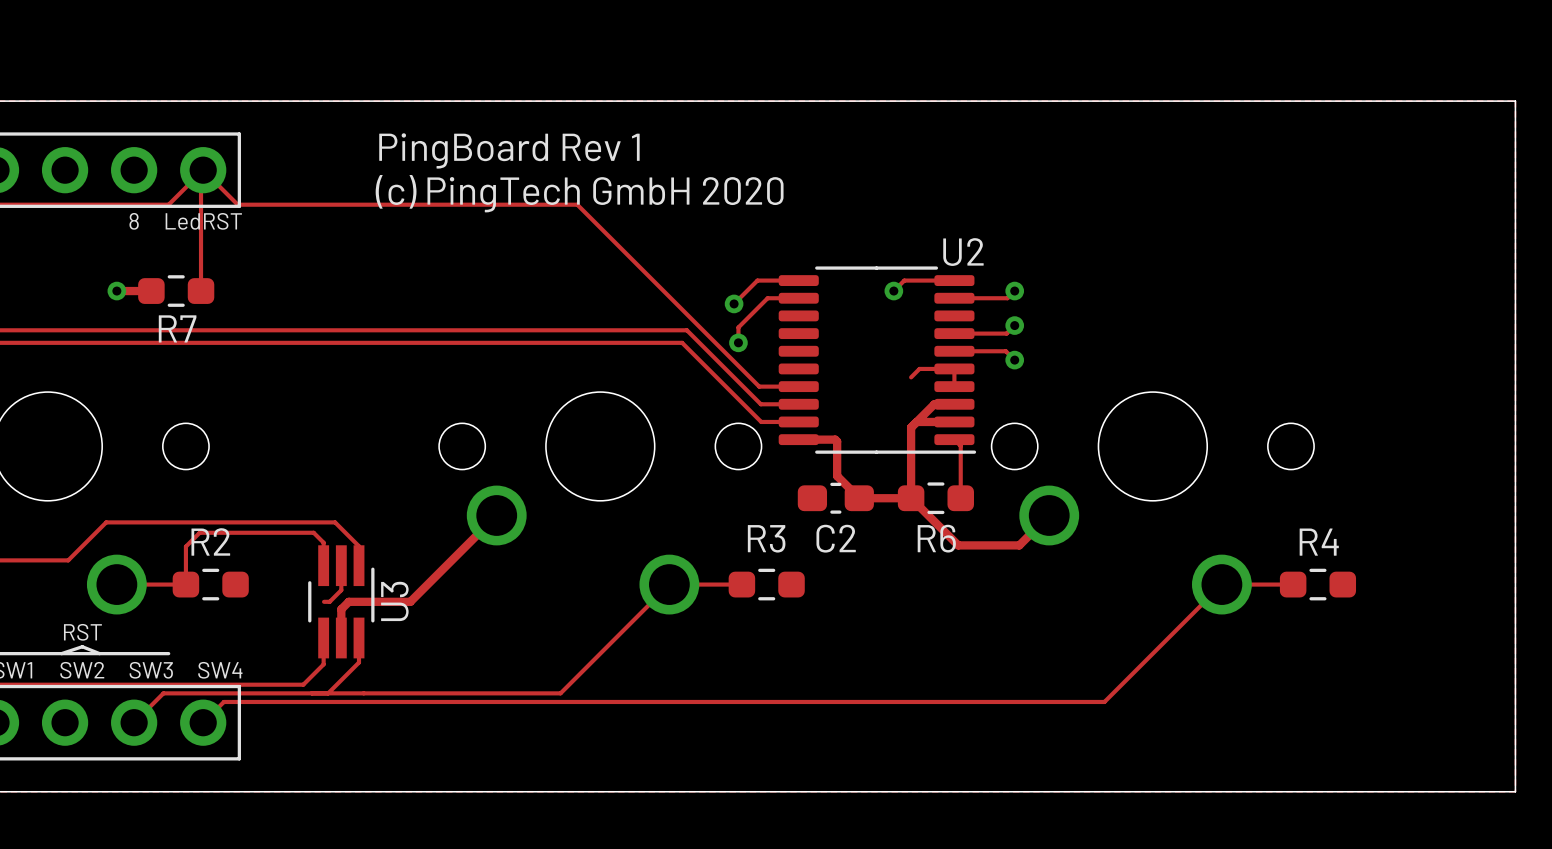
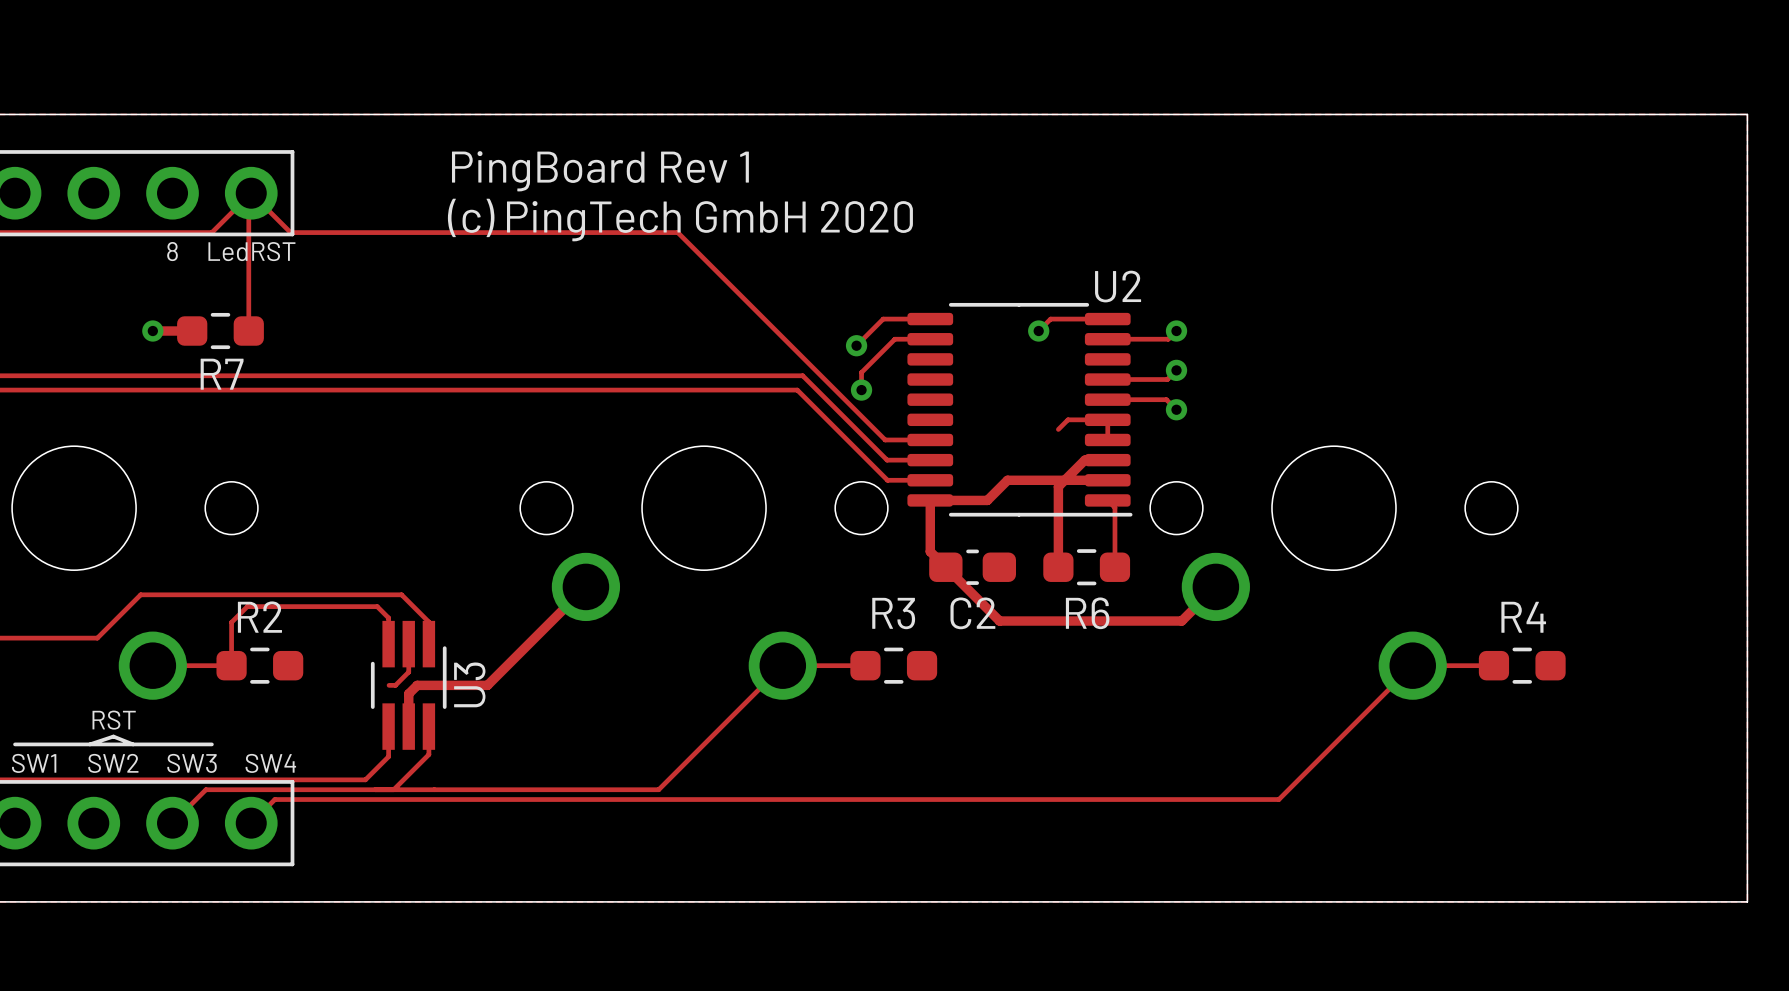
track: none -> (1064, 480) (1007, 480) (987, 500) (971, 500)
track: (835, 439) (837, 441) (837, 476) (859, 498) (911, 498) (958, 545) -> (930, 500) (930, 551) (999, 621) (1112, 621)

